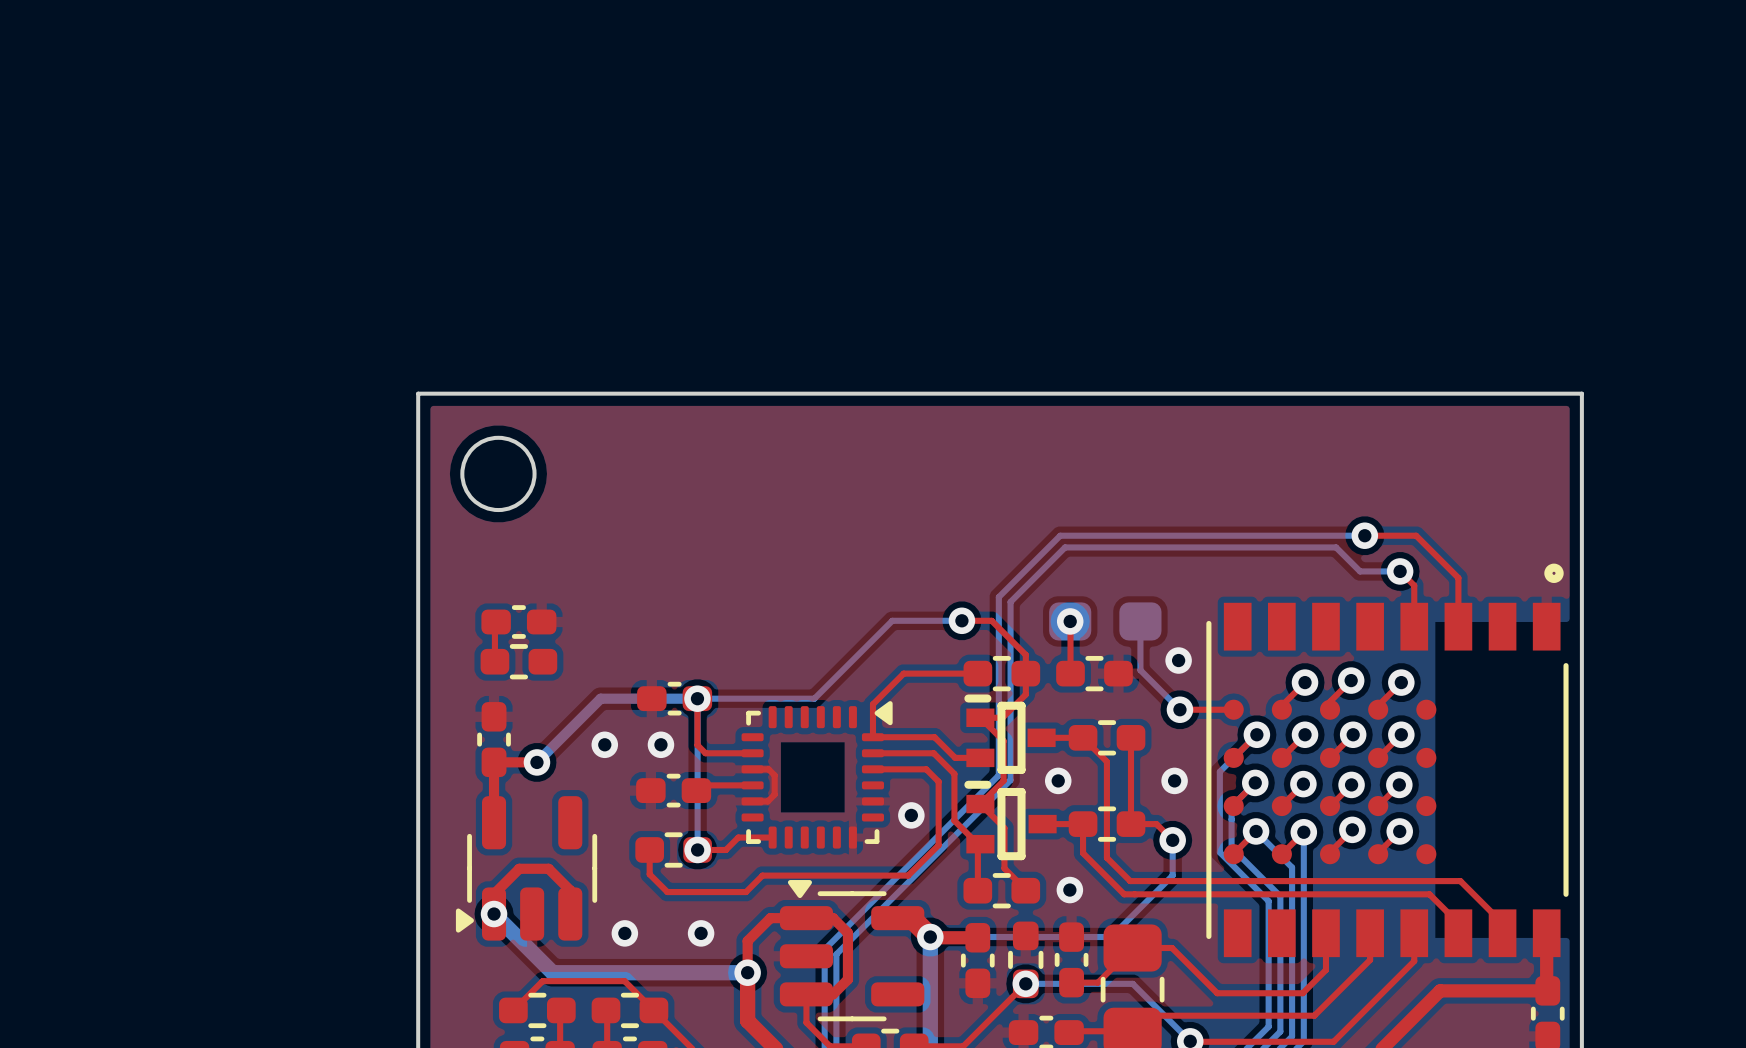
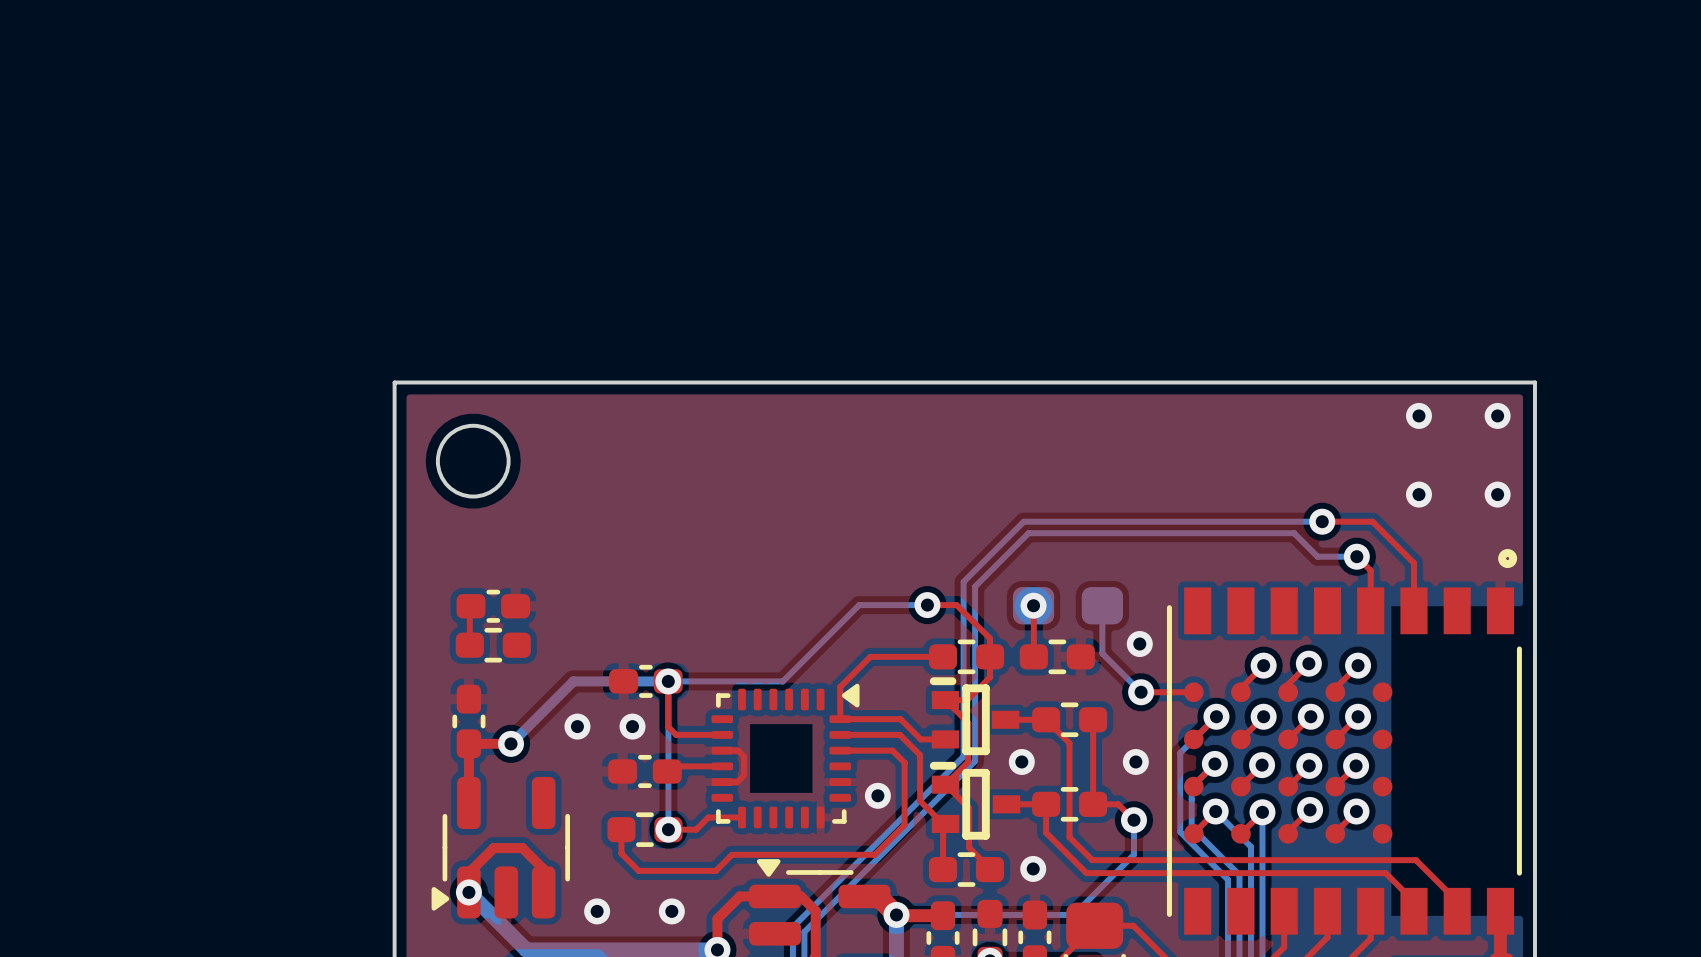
via: none -> (1418, 415)
via: none -> (1497, 415)
via: none -> (1418, 494)
via: none -> (1497, 494)

